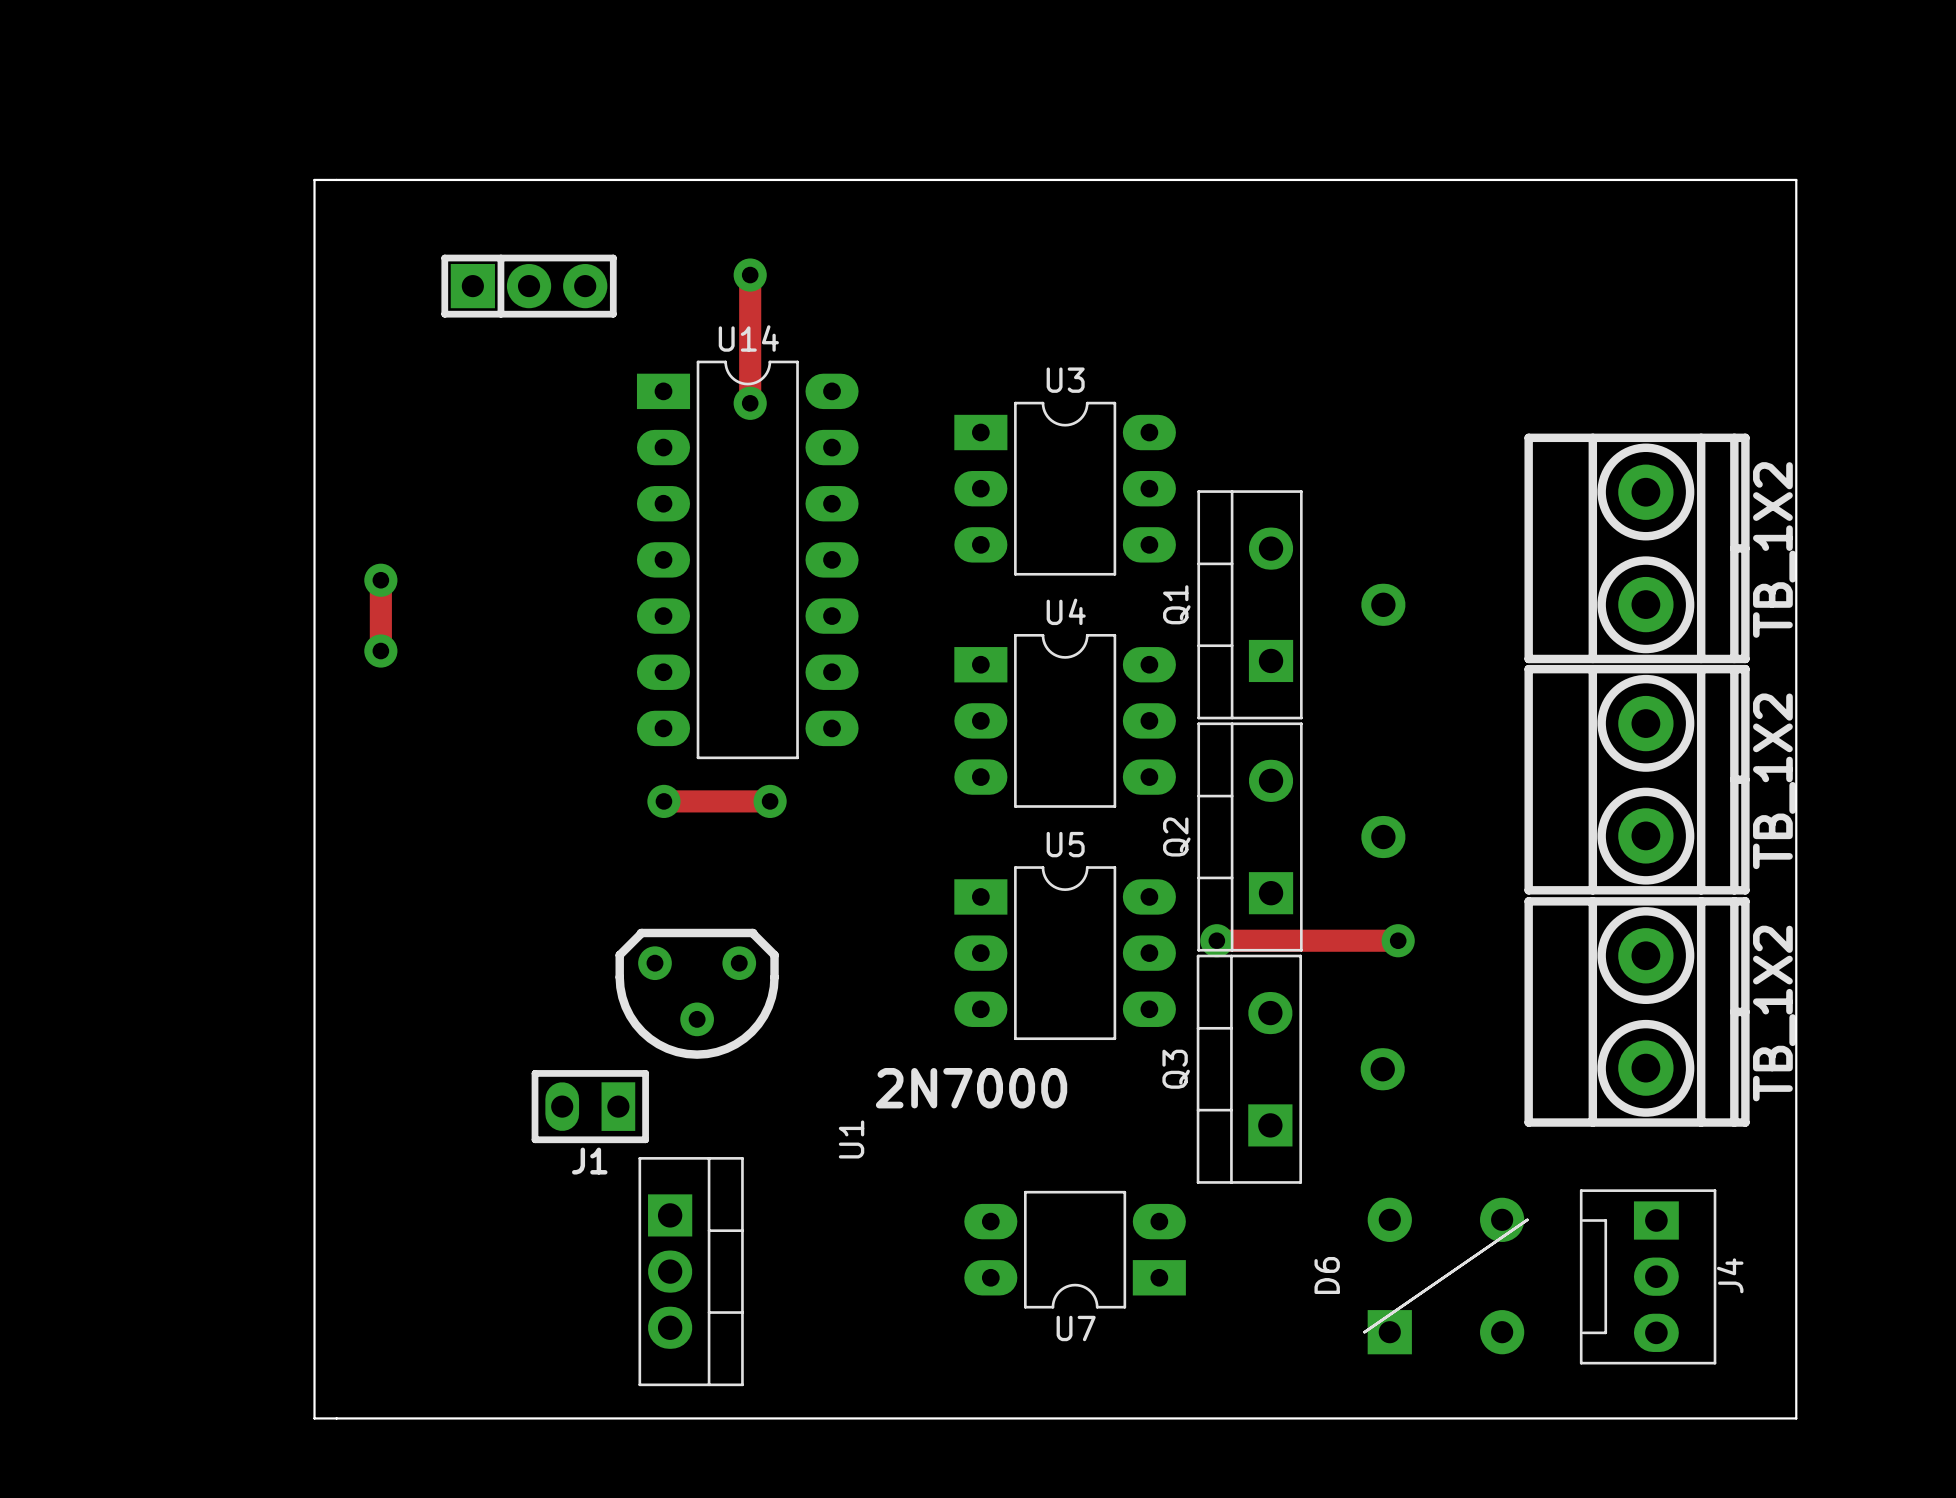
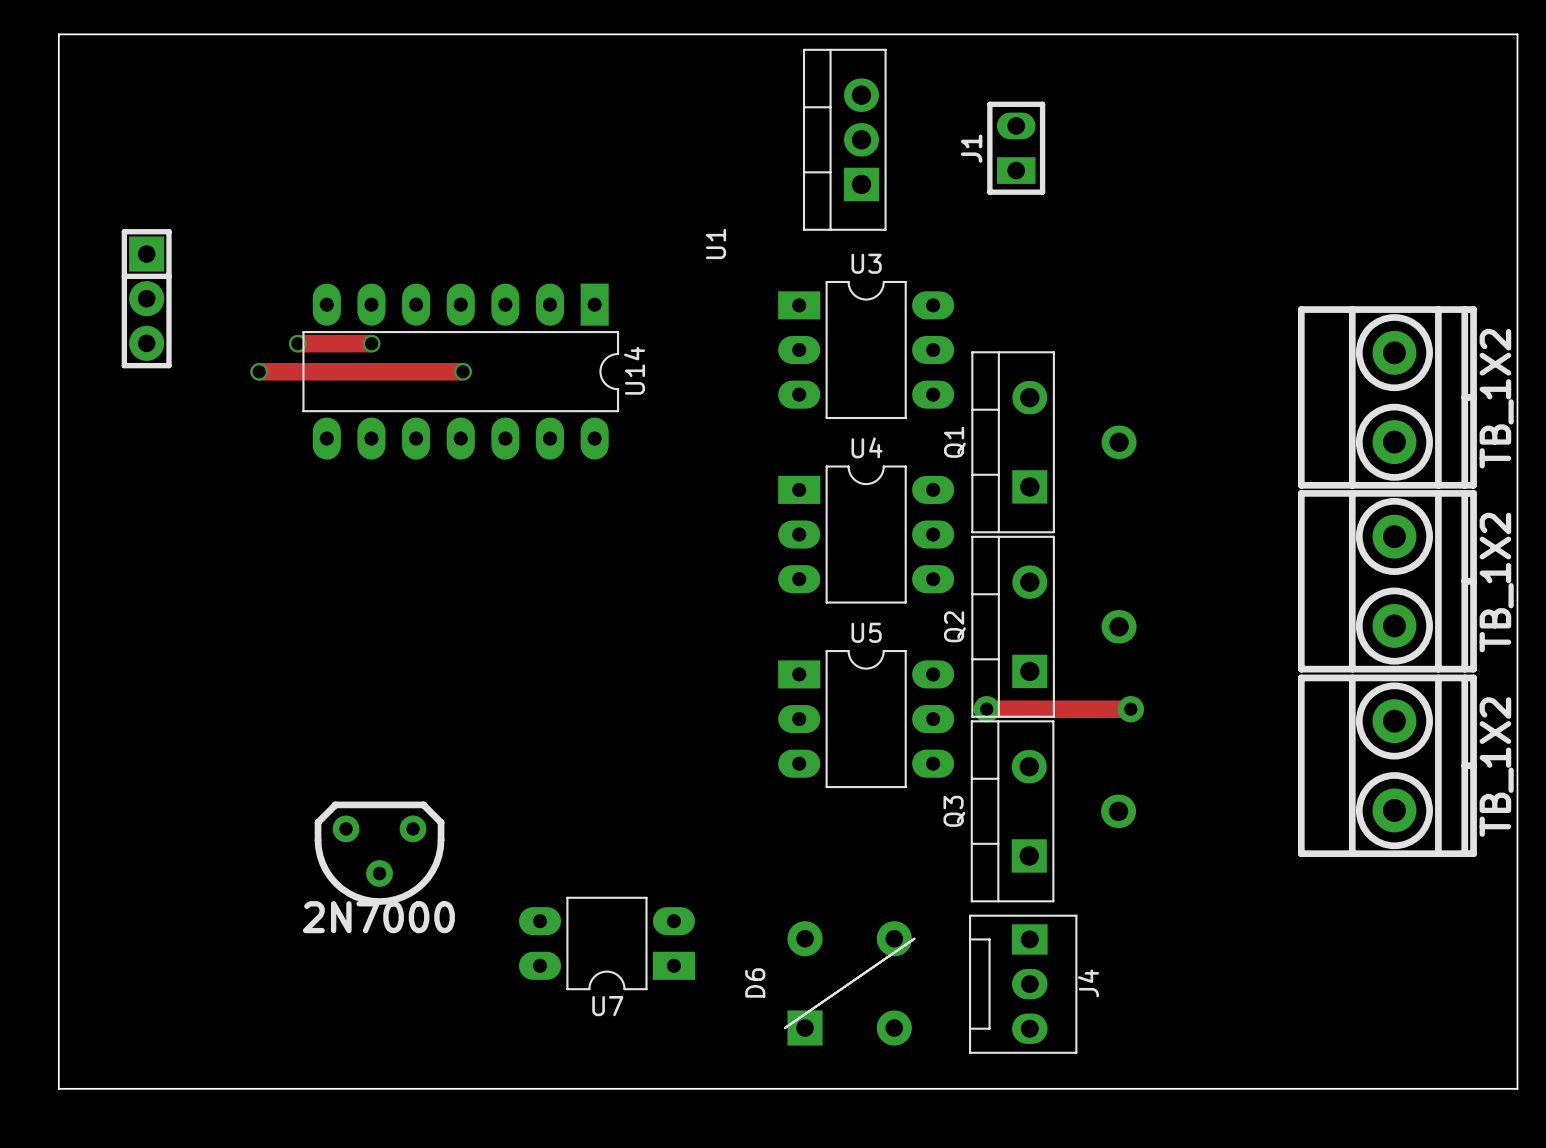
track: (750, 275) (750, 403) -> none
via: (750, 275) -> none
part rotation: 0° (529, 286) -> 90° clockwise (146, 298)
part position: (529, 286) -> (146, 298)
via: (750, 403) -> none
track: none -> (297, 343) (371, 343)
via: none -> (297, 343)
via: none -> (371, 343)
track: none -> (259, 371) (463, 371)
via: none -> (259, 371)
via: none -> (463, 371)
part position: (1637, 548) -> (1387, 397)
U14 rotation: 0° (747, 559) -> 90° clockwise (460, 371)
track: (380, 580) (380, 651) -> none
via: (380, 580) -> none
via: (380, 651) -> none
part position: (1637, 779) -> (1387, 581)
track: (663, 801) (770, 801) -> none
via: (663, 801) -> none
via: (770, 801) -> none
part position: (697, 993) -> (379, 853)
part position: (1637, 1011) -> (1387, 765)
part value position: 2N7000 (971, 1088) -> 2N7000 (378, 917)
J1 rotation: 0° (590, 1106) -> 90° clockwise (1016, 148)
J1 position: (590, 1106) -> (1016, 148)
U7 position: (1075, 1249) -> (606, 943)
U1 rotation: 0° (691, 1271) -> 180° (844, 139)
U1 position: (691, 1271) -> (844, 139)
D6 position: (1445, 1276) -> (849, 983)
J4 position: (1648, 1276) -> (1023, 984)
board edge: (314, 1418) (314, 179) (1796, 179) (1796, 1418) -> (269, 1088) (58, 1088) (58, 34) (1517, 34) (1517, 1088) (1447, 1088)

